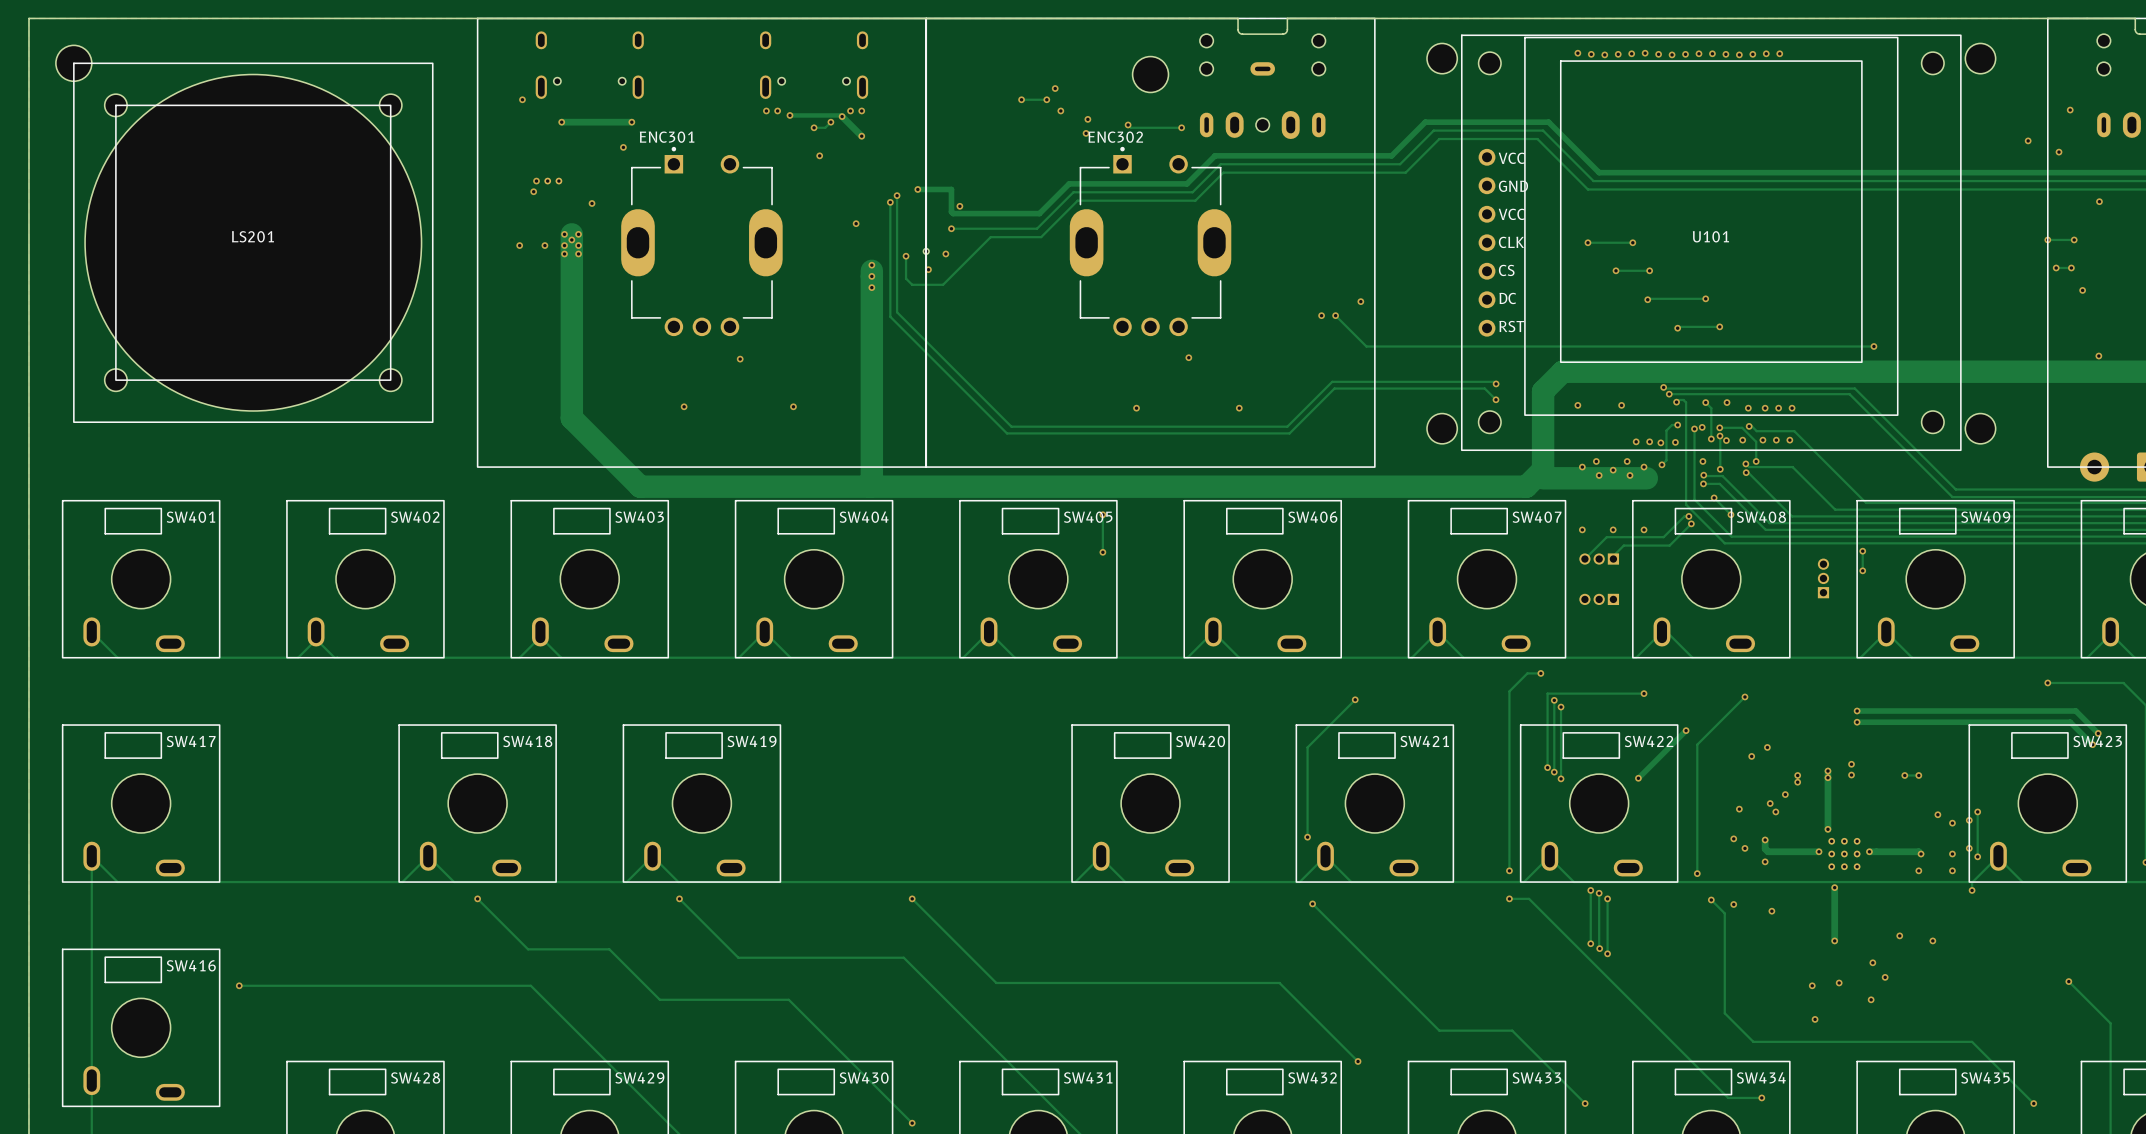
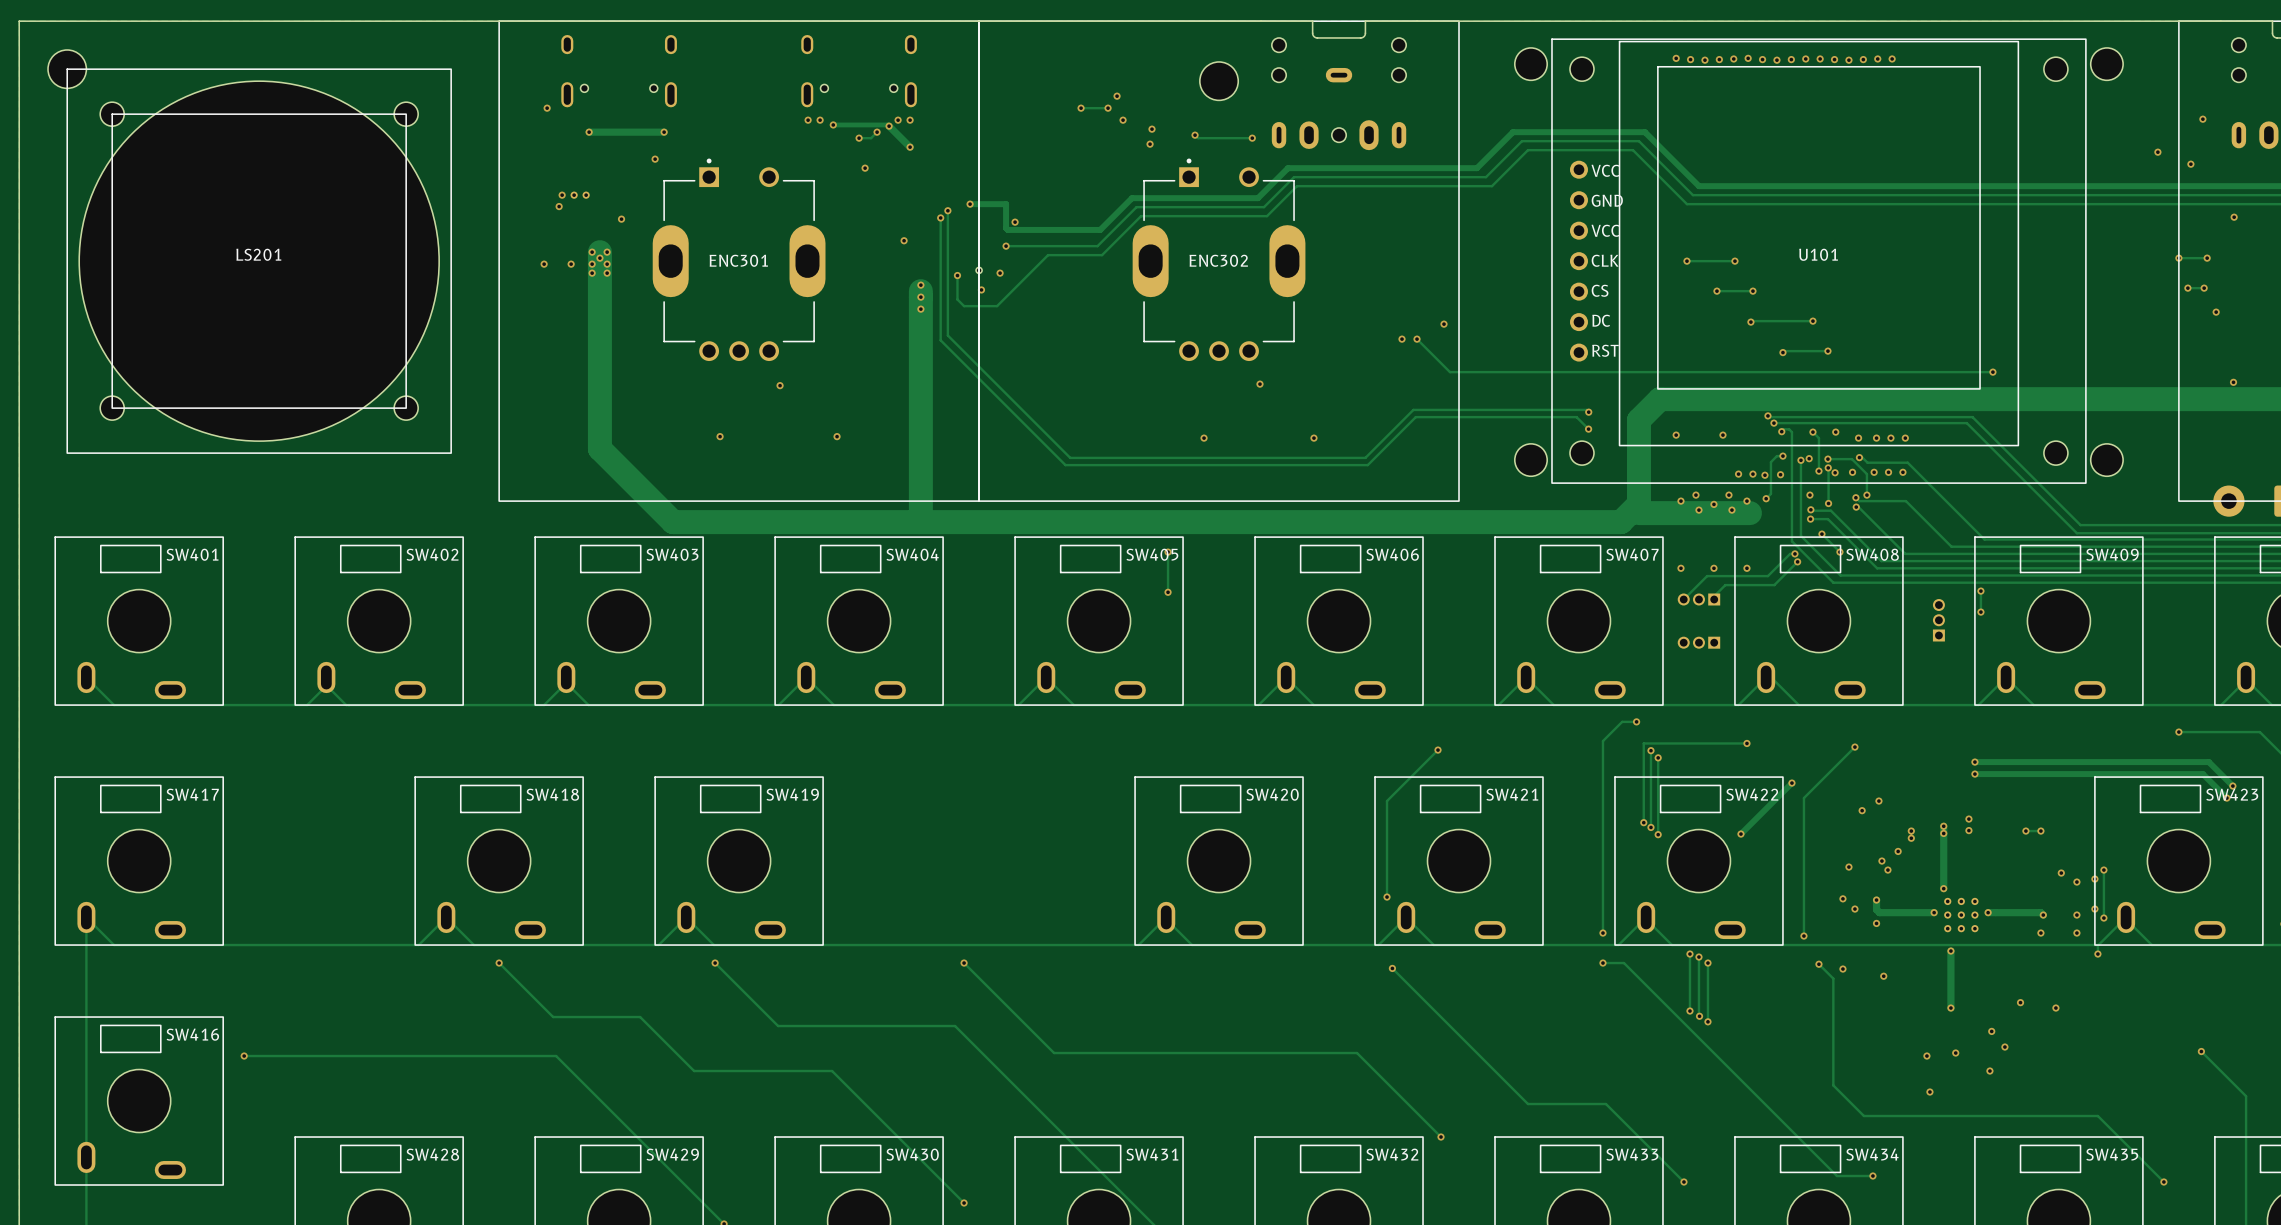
ENC301 name position: ENC301 (667, 137) -> ENC301 (738, 260)
ENC302 name position: ENC302 (1115, 137) -> ENC302 (1218, 260)

